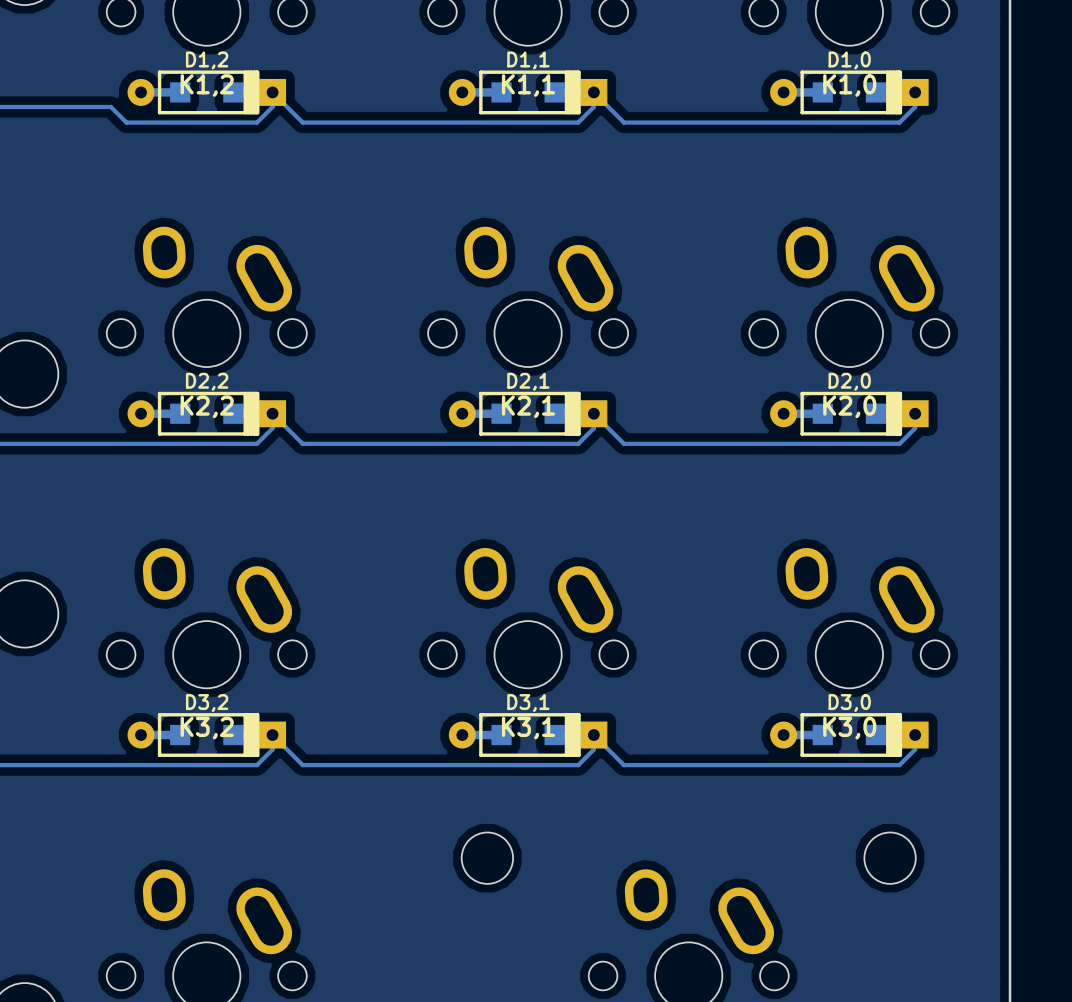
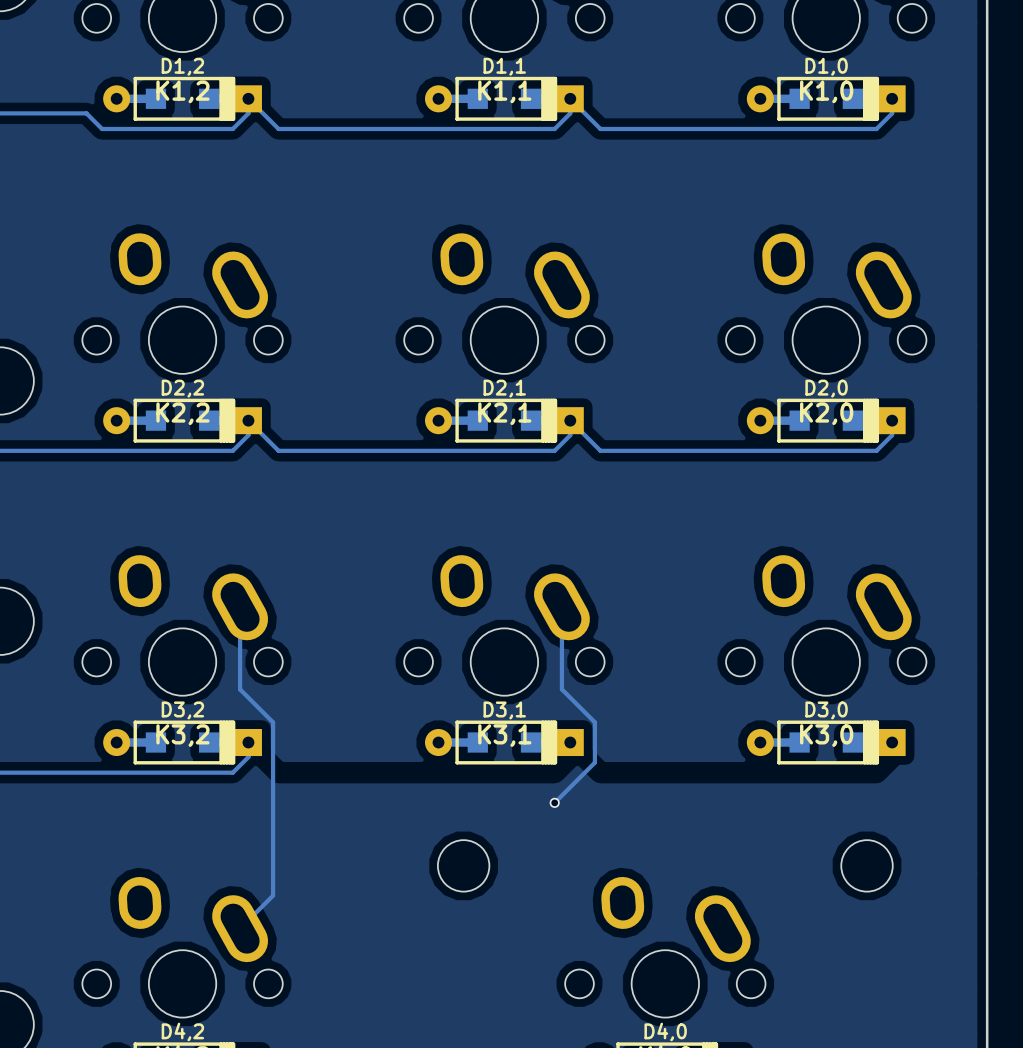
track: none -> (240, 606) (240, 689) (273, 722) (273, 895) (240, 928)
track: none -> (561, 606) (561, 689) (594, 722) (594, 762) (554, 802)
track: (915, 735) (915, 749) (899, 765) (623, 765) (593, 735) (593, 749) (578, 765) (302, 765) (272, 735) -> none
via: none -> (554, 802)

